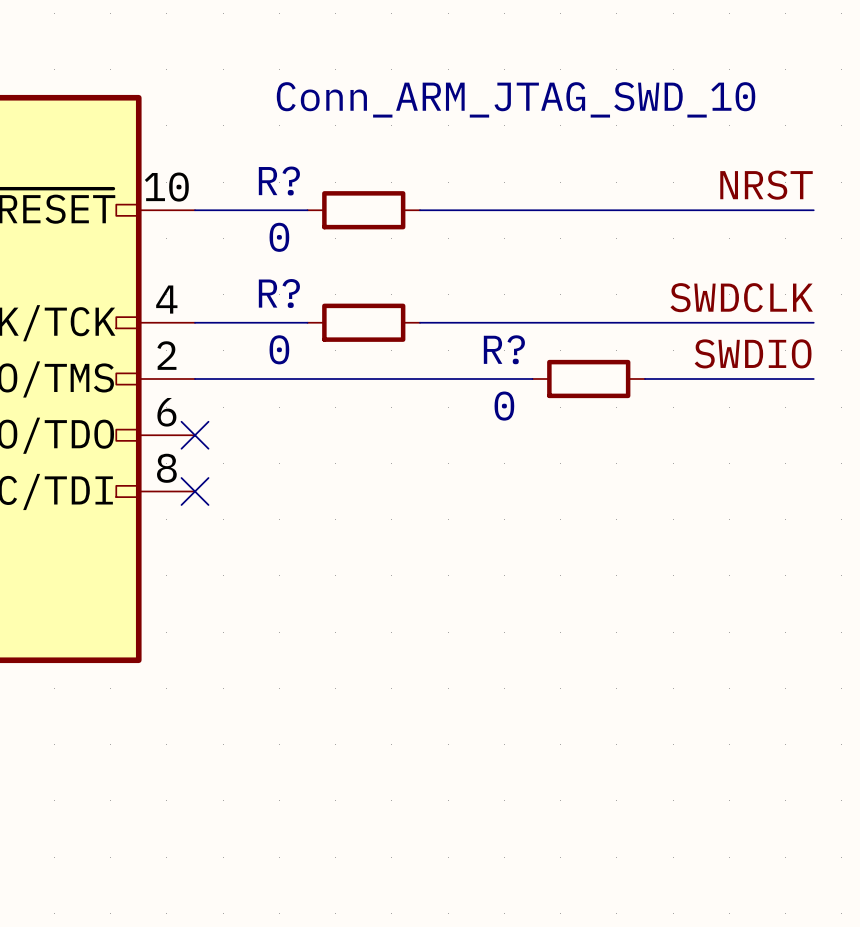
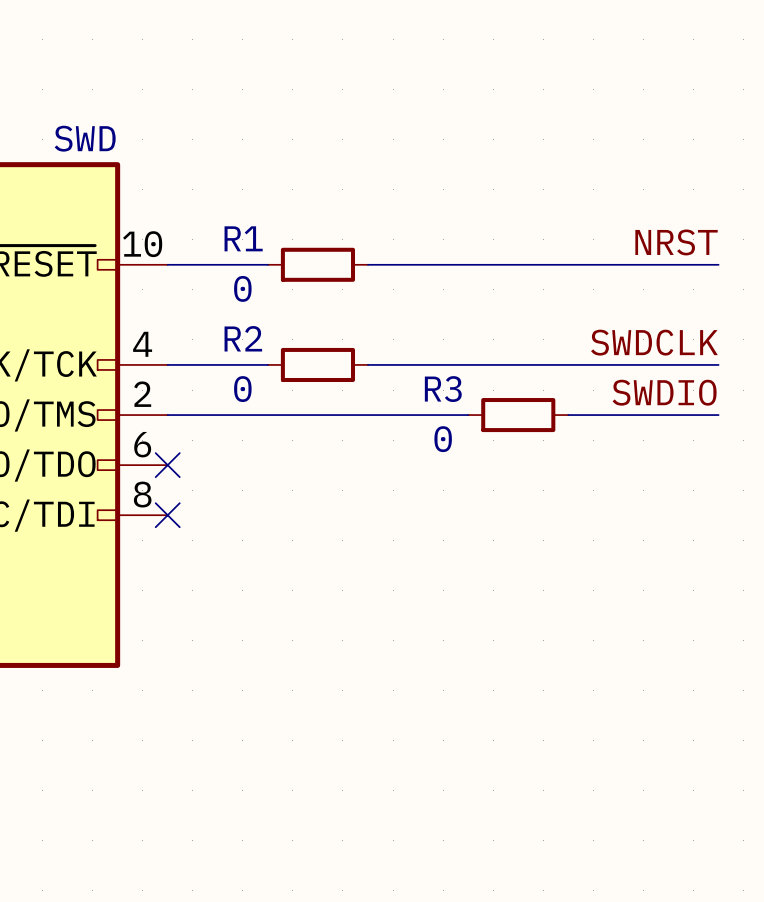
part value: Conn_ARM_JTAG_SWD_10 (516, 99) -> SWD (85, 138)
R? name: R? (279, 181) -> R1 (243, 238)
R? name: R? (279, 293) -> R2 (243, 338)
R? name: R? (504, 349) -> R3 (443, 389)

